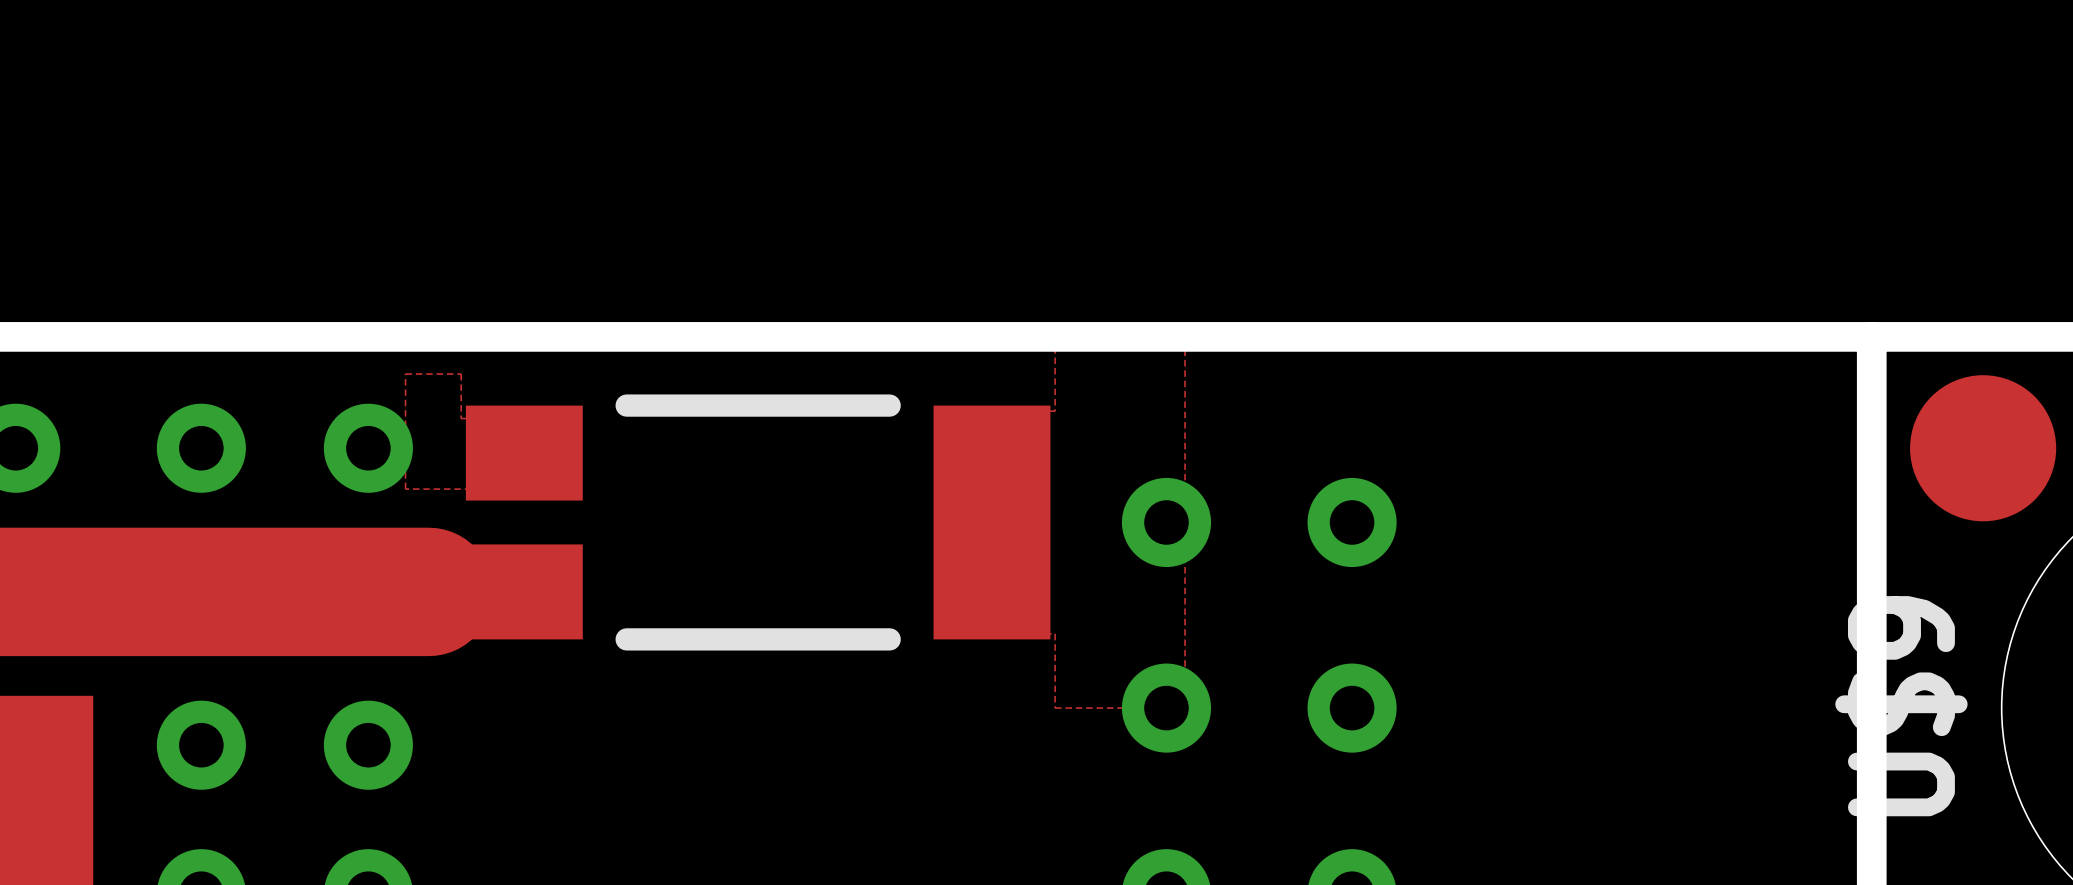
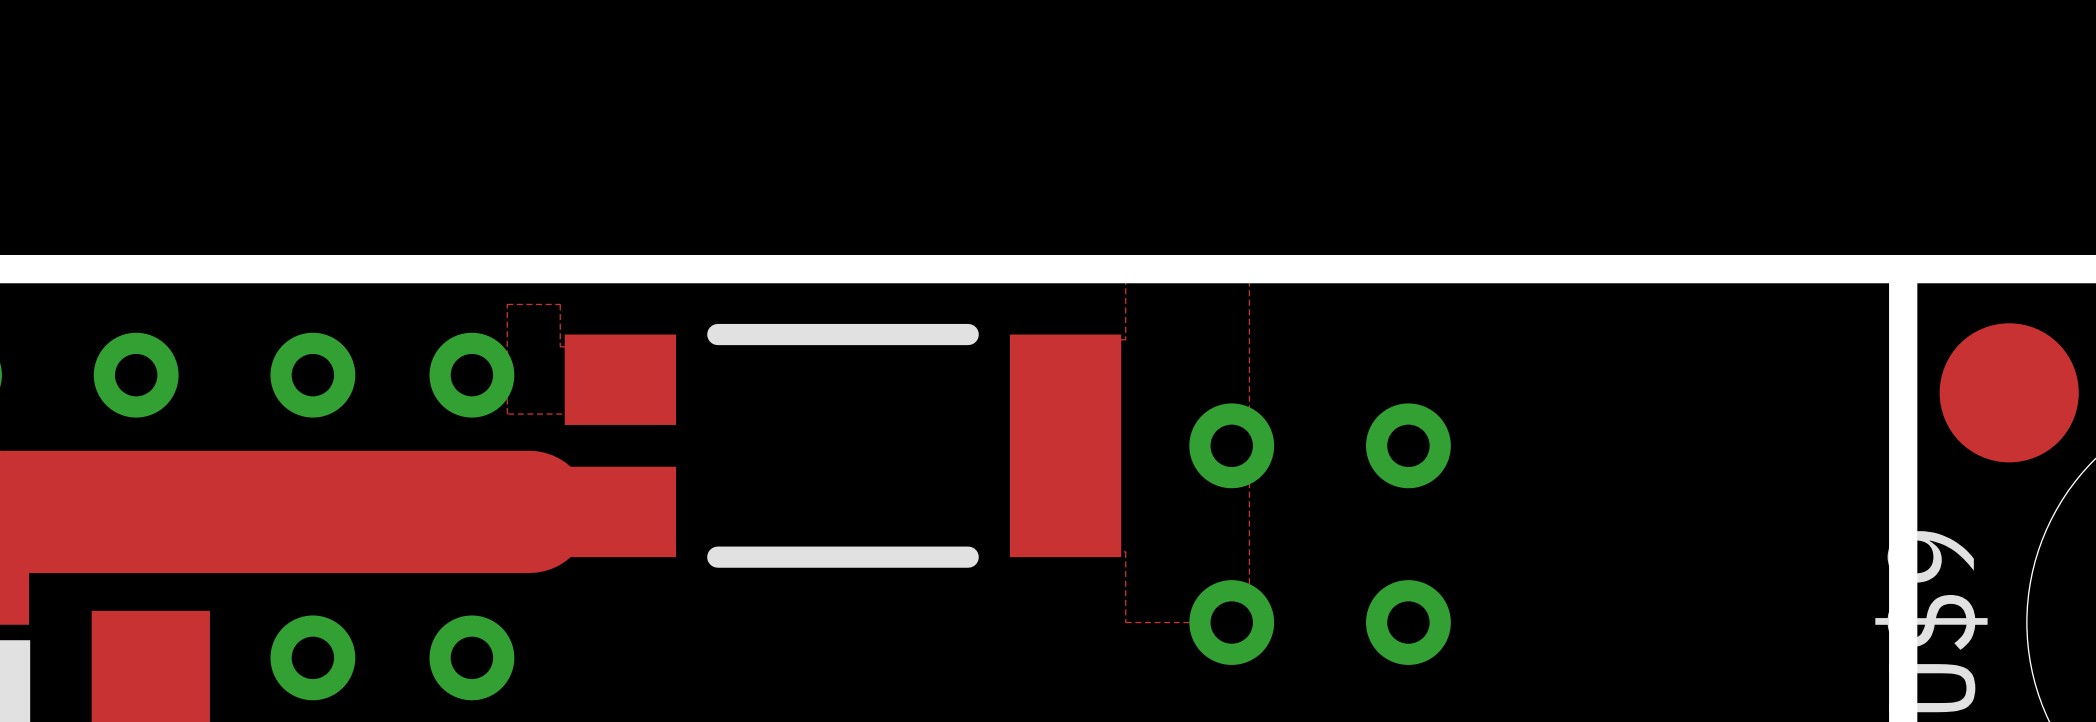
part position: (1983, 448) -> (2009, 392)

